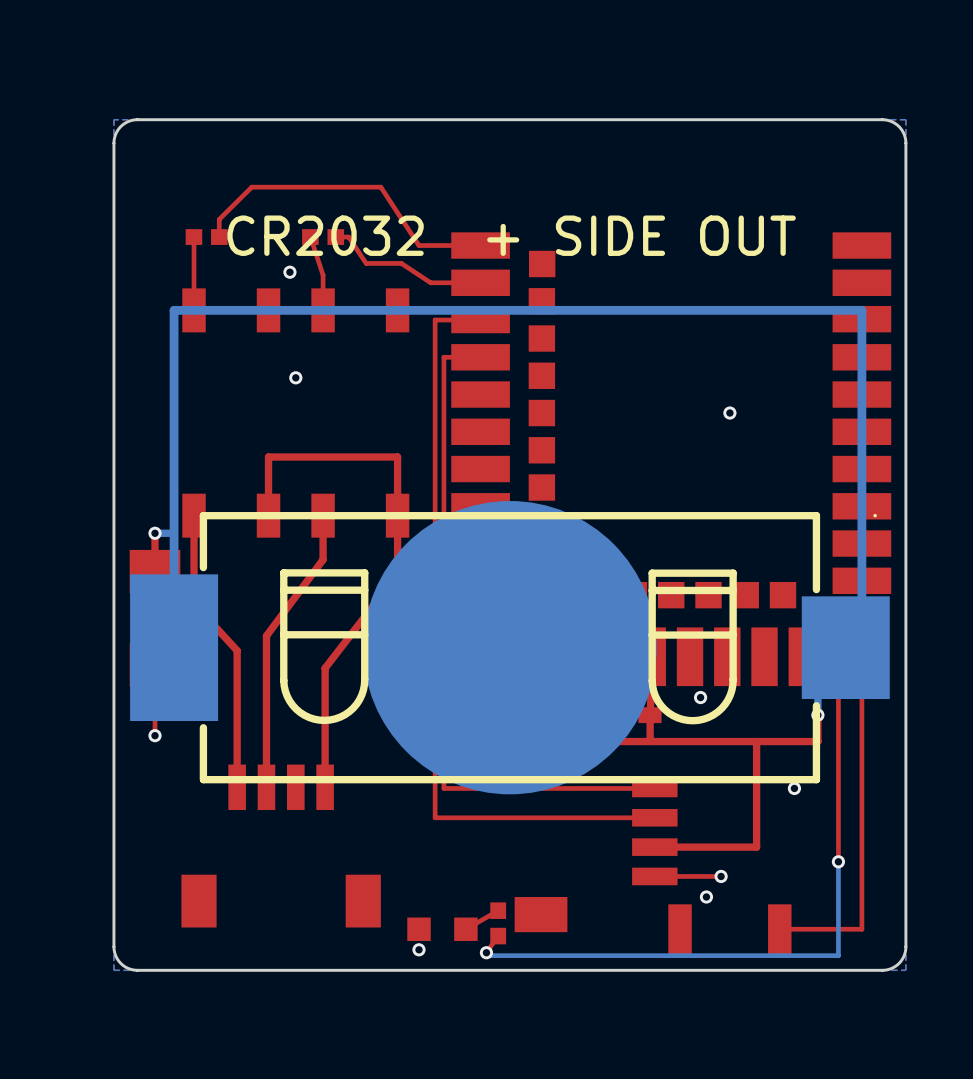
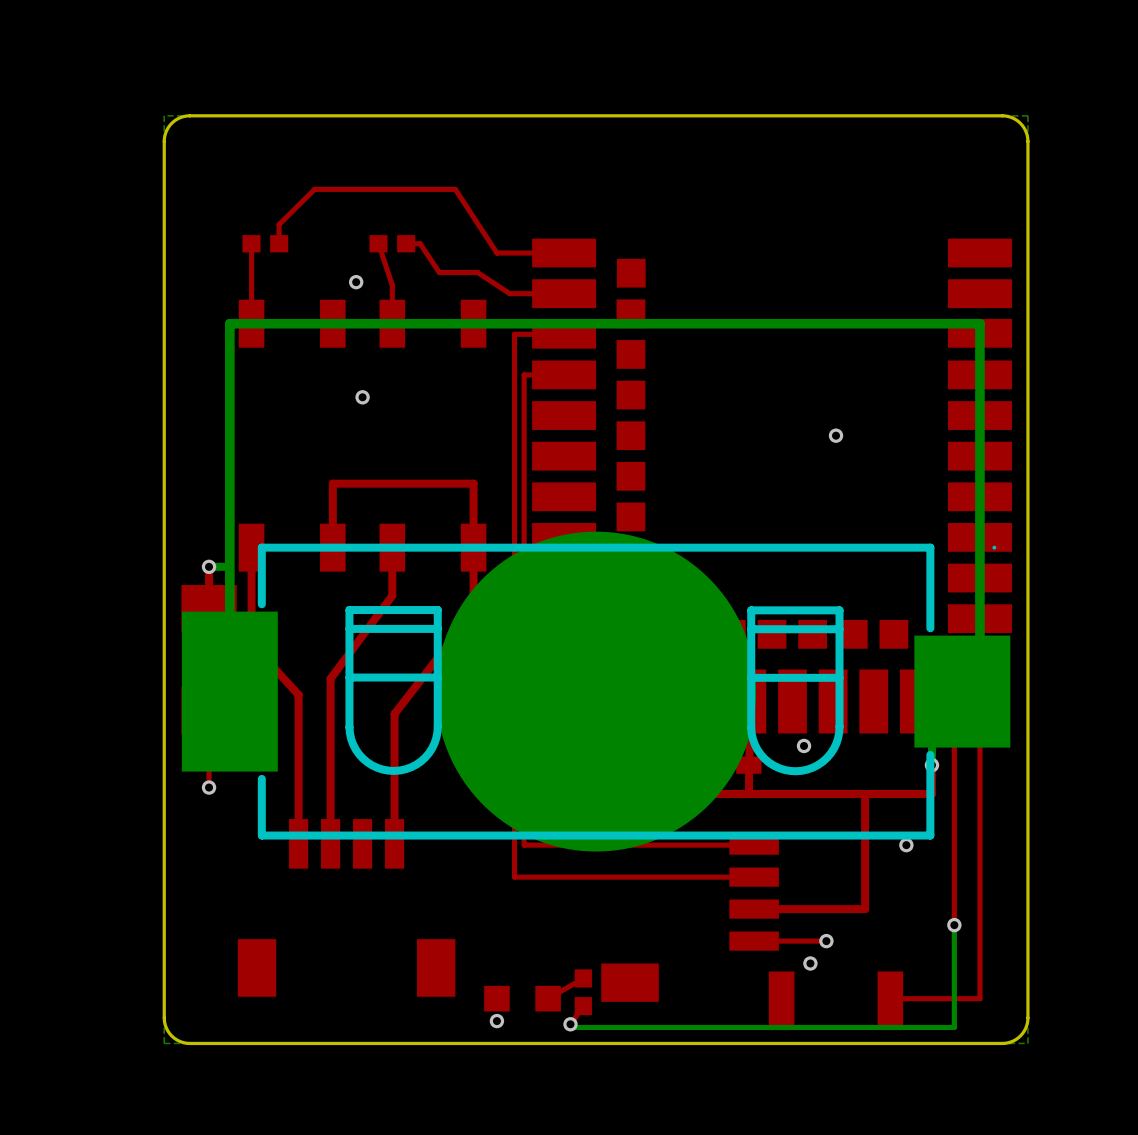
text: CR2032 + SIDE OUT (511, 235) -> none

